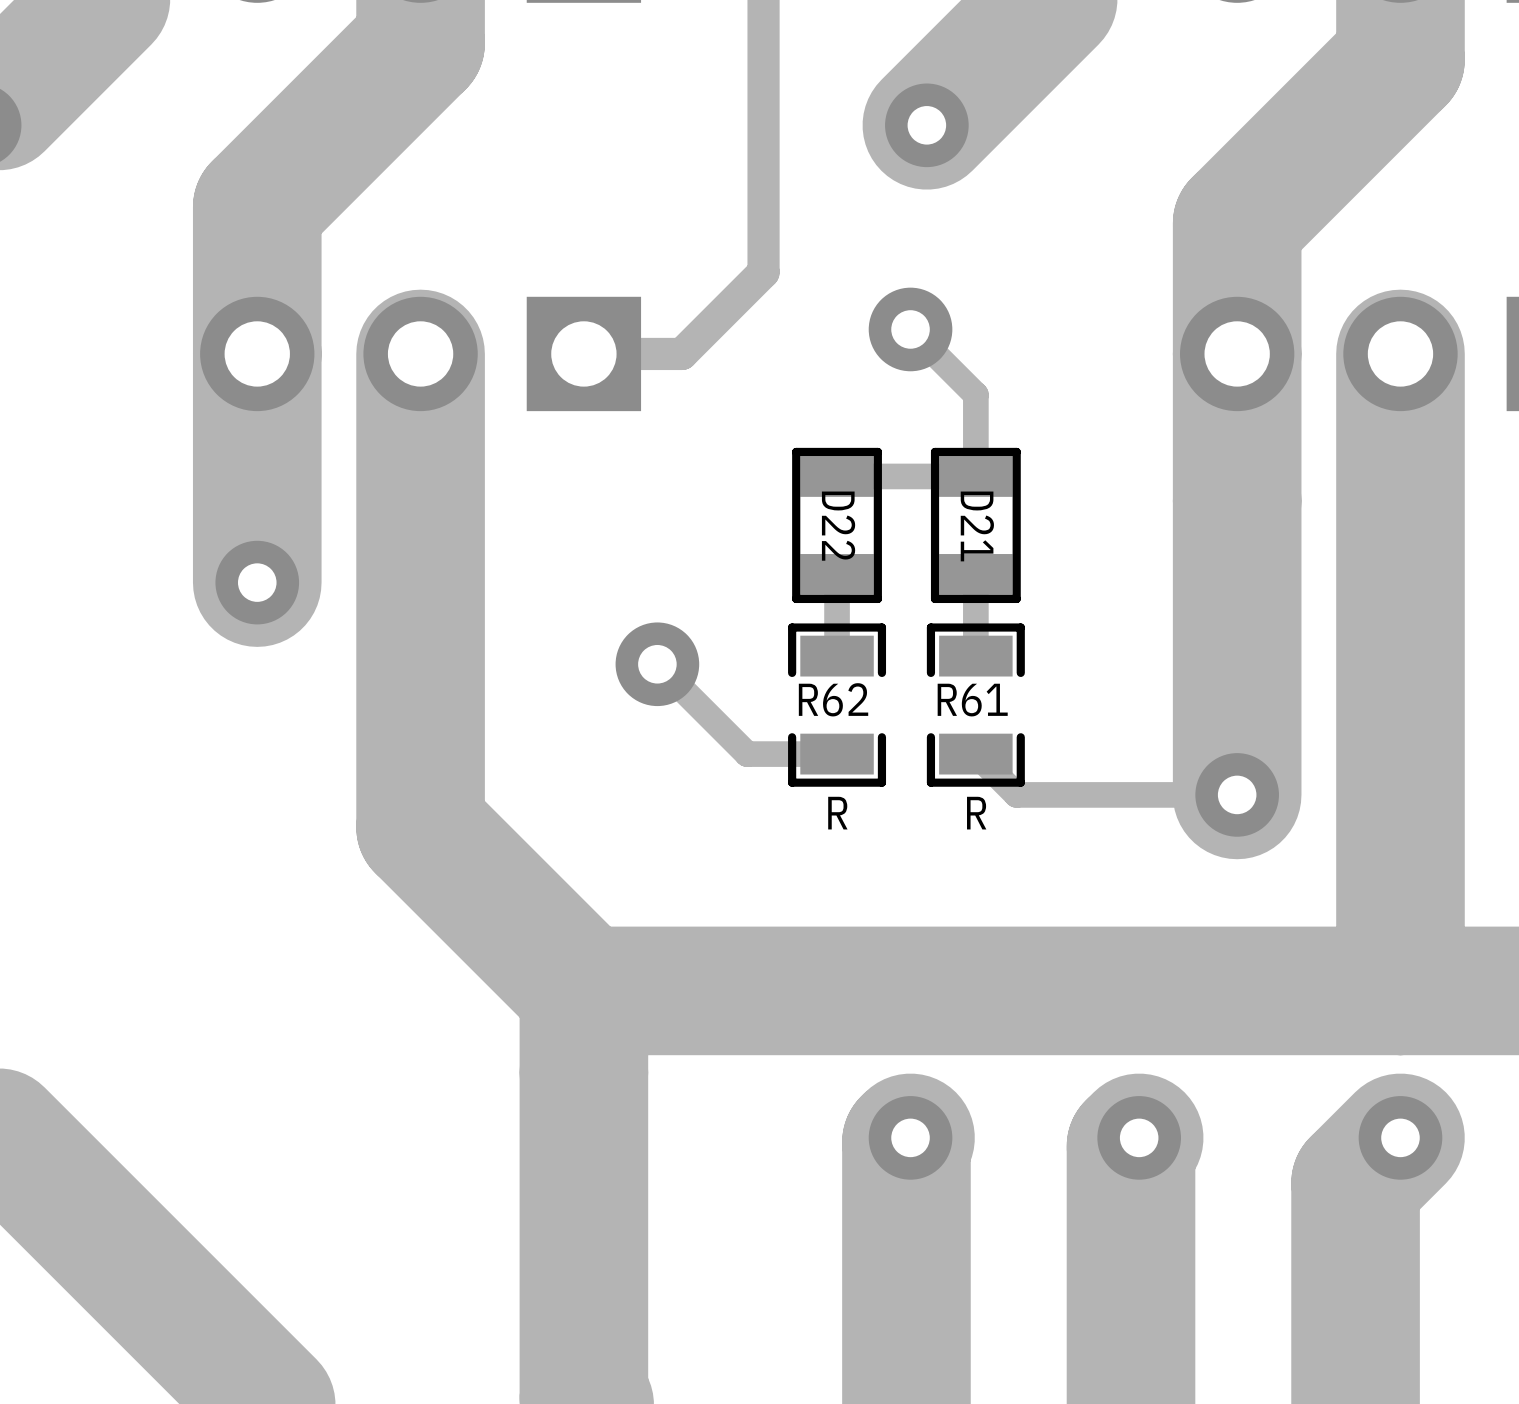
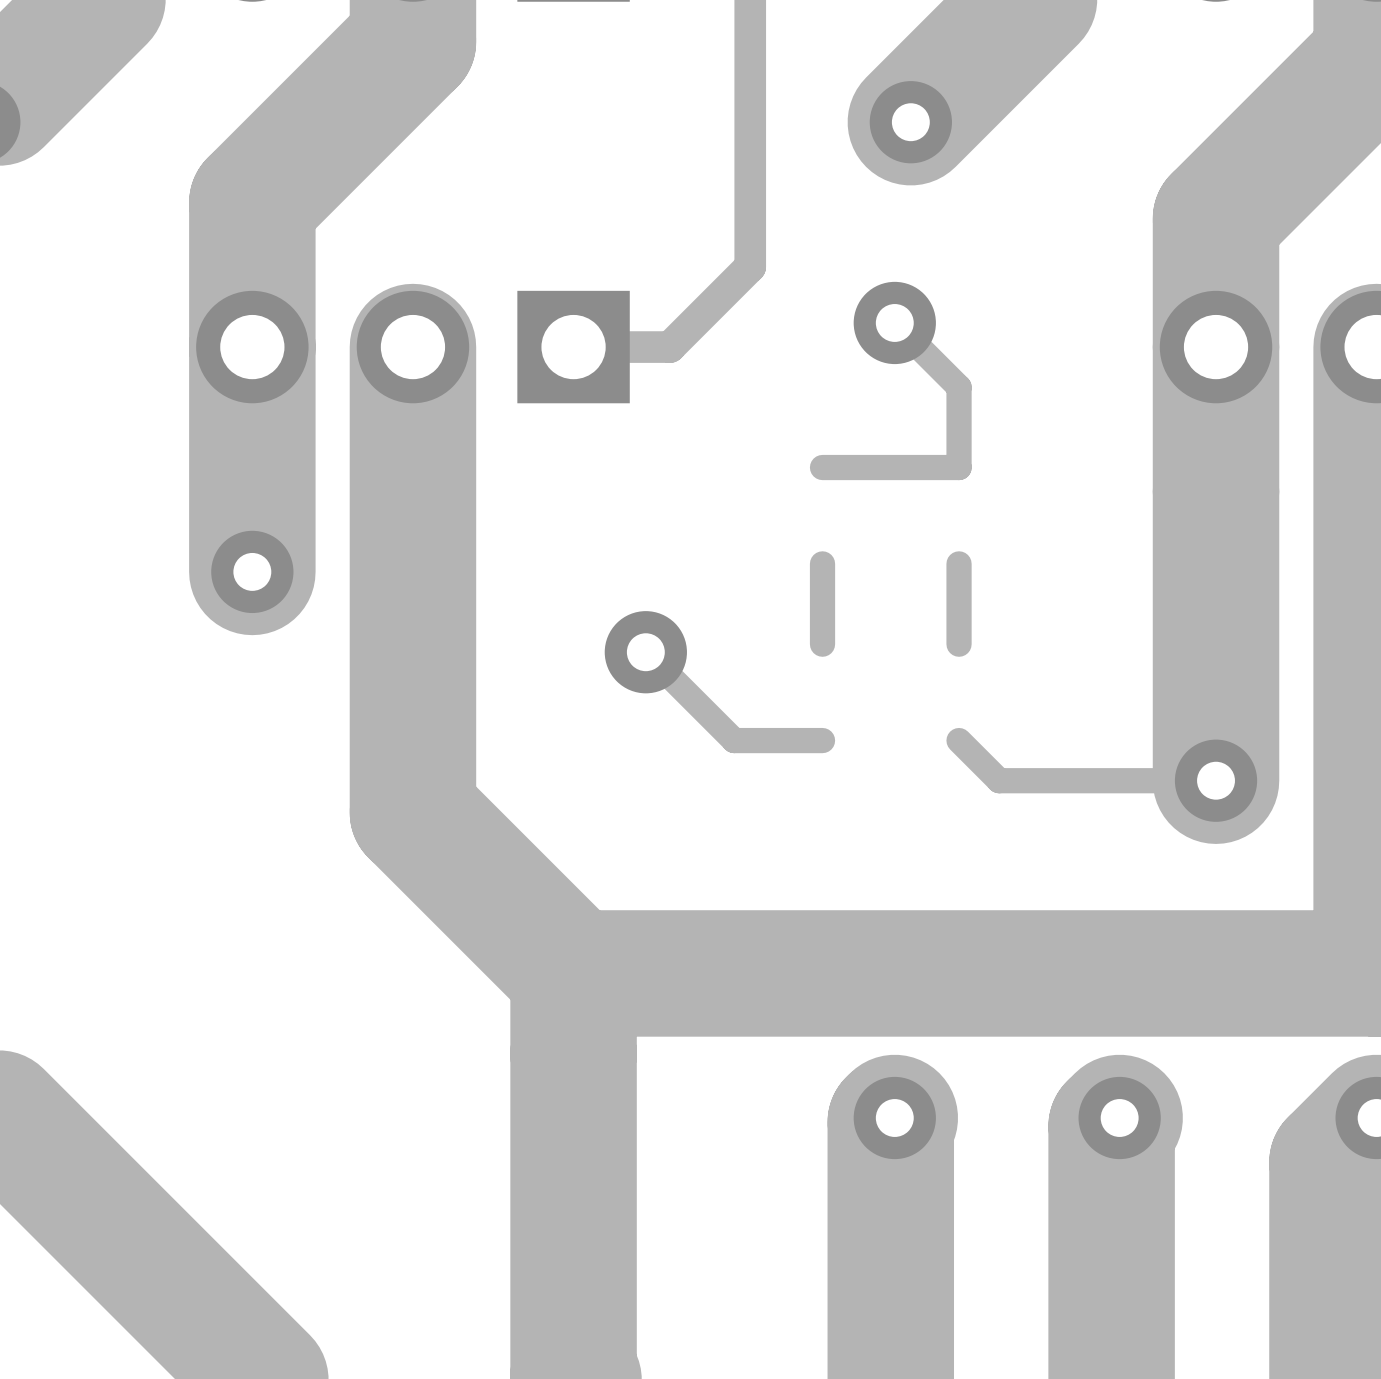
D22: (837, 525) -> none
D21: (975, 525) -> none
R62: R (837, 705) -> none
R61: R (975, 705) -> none

